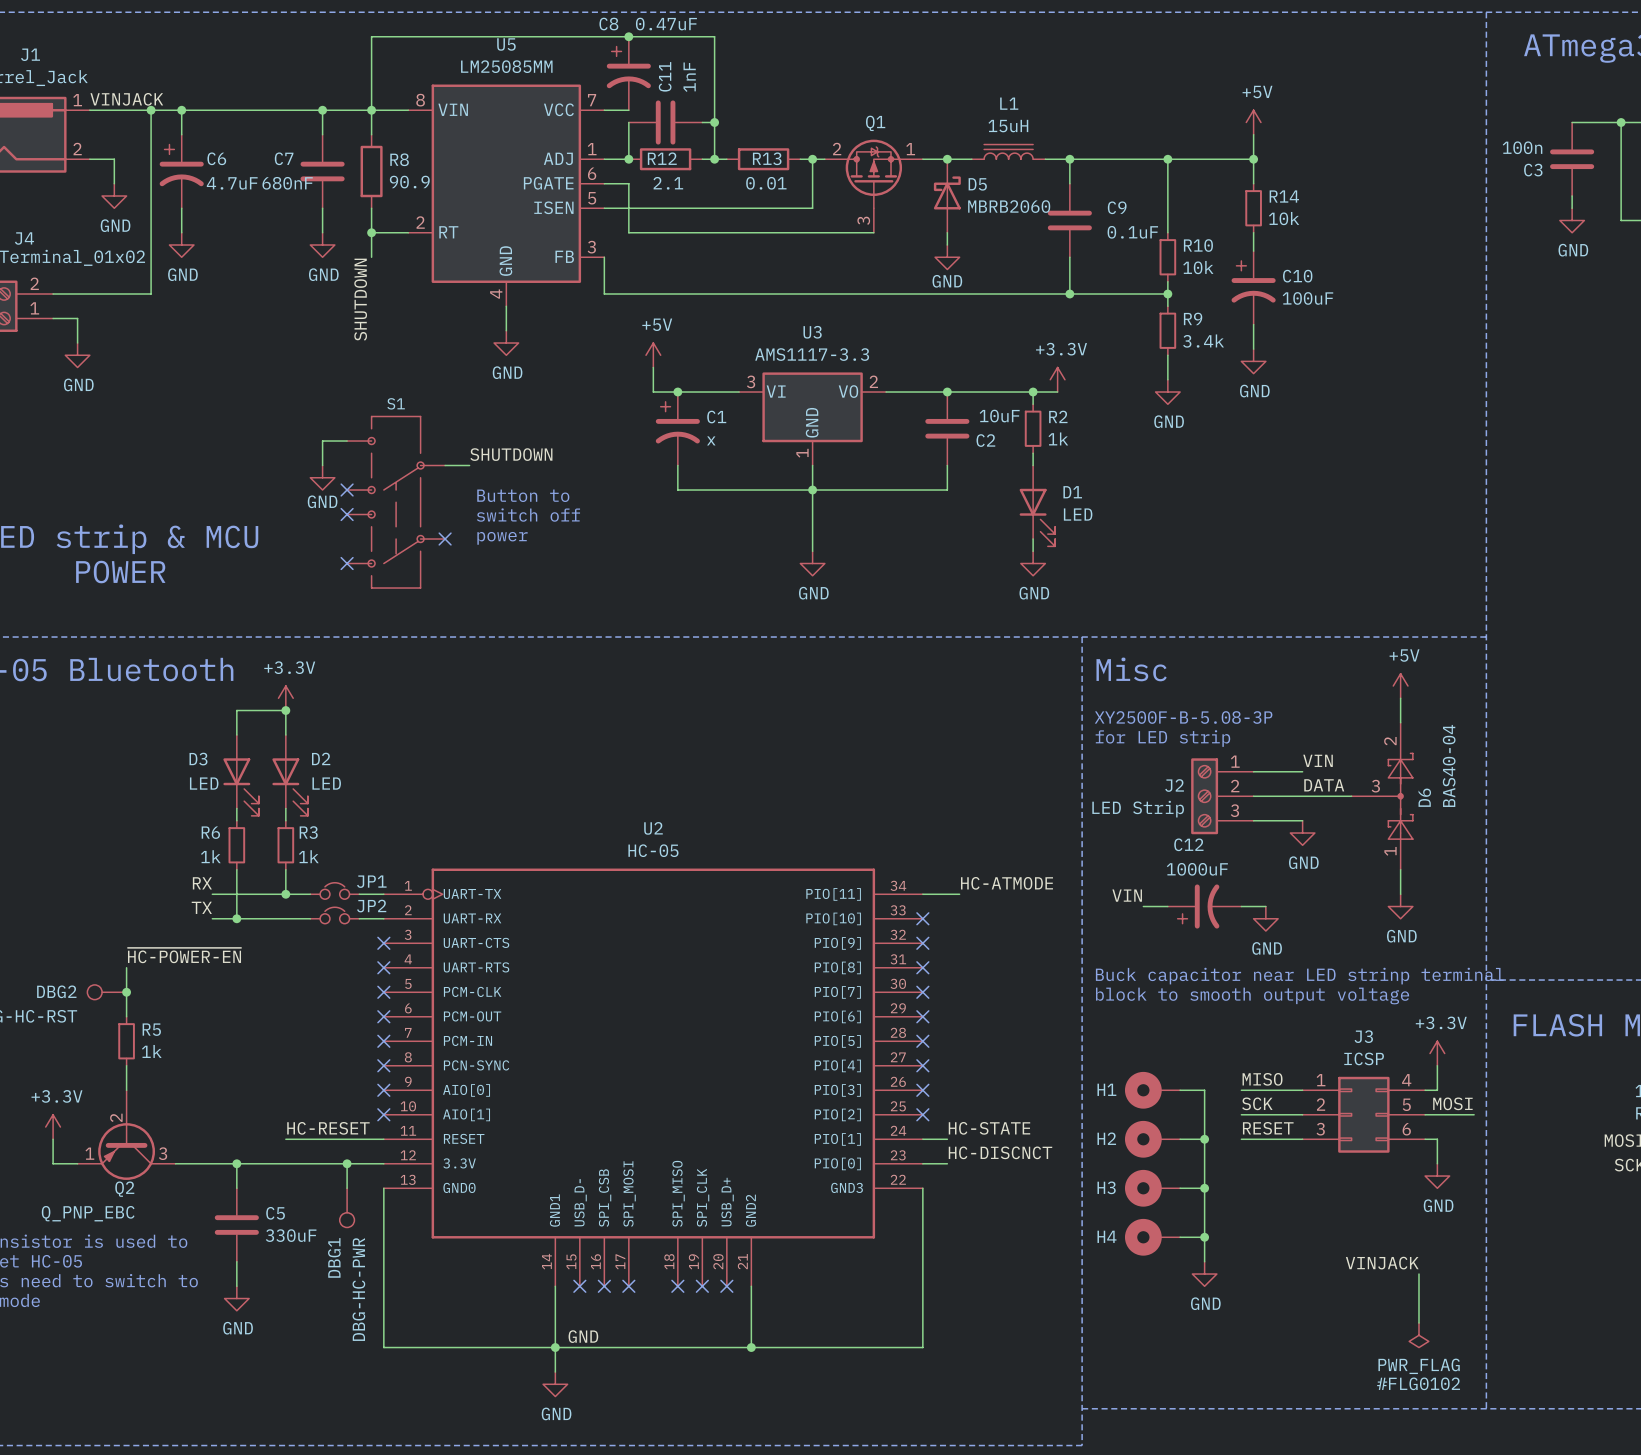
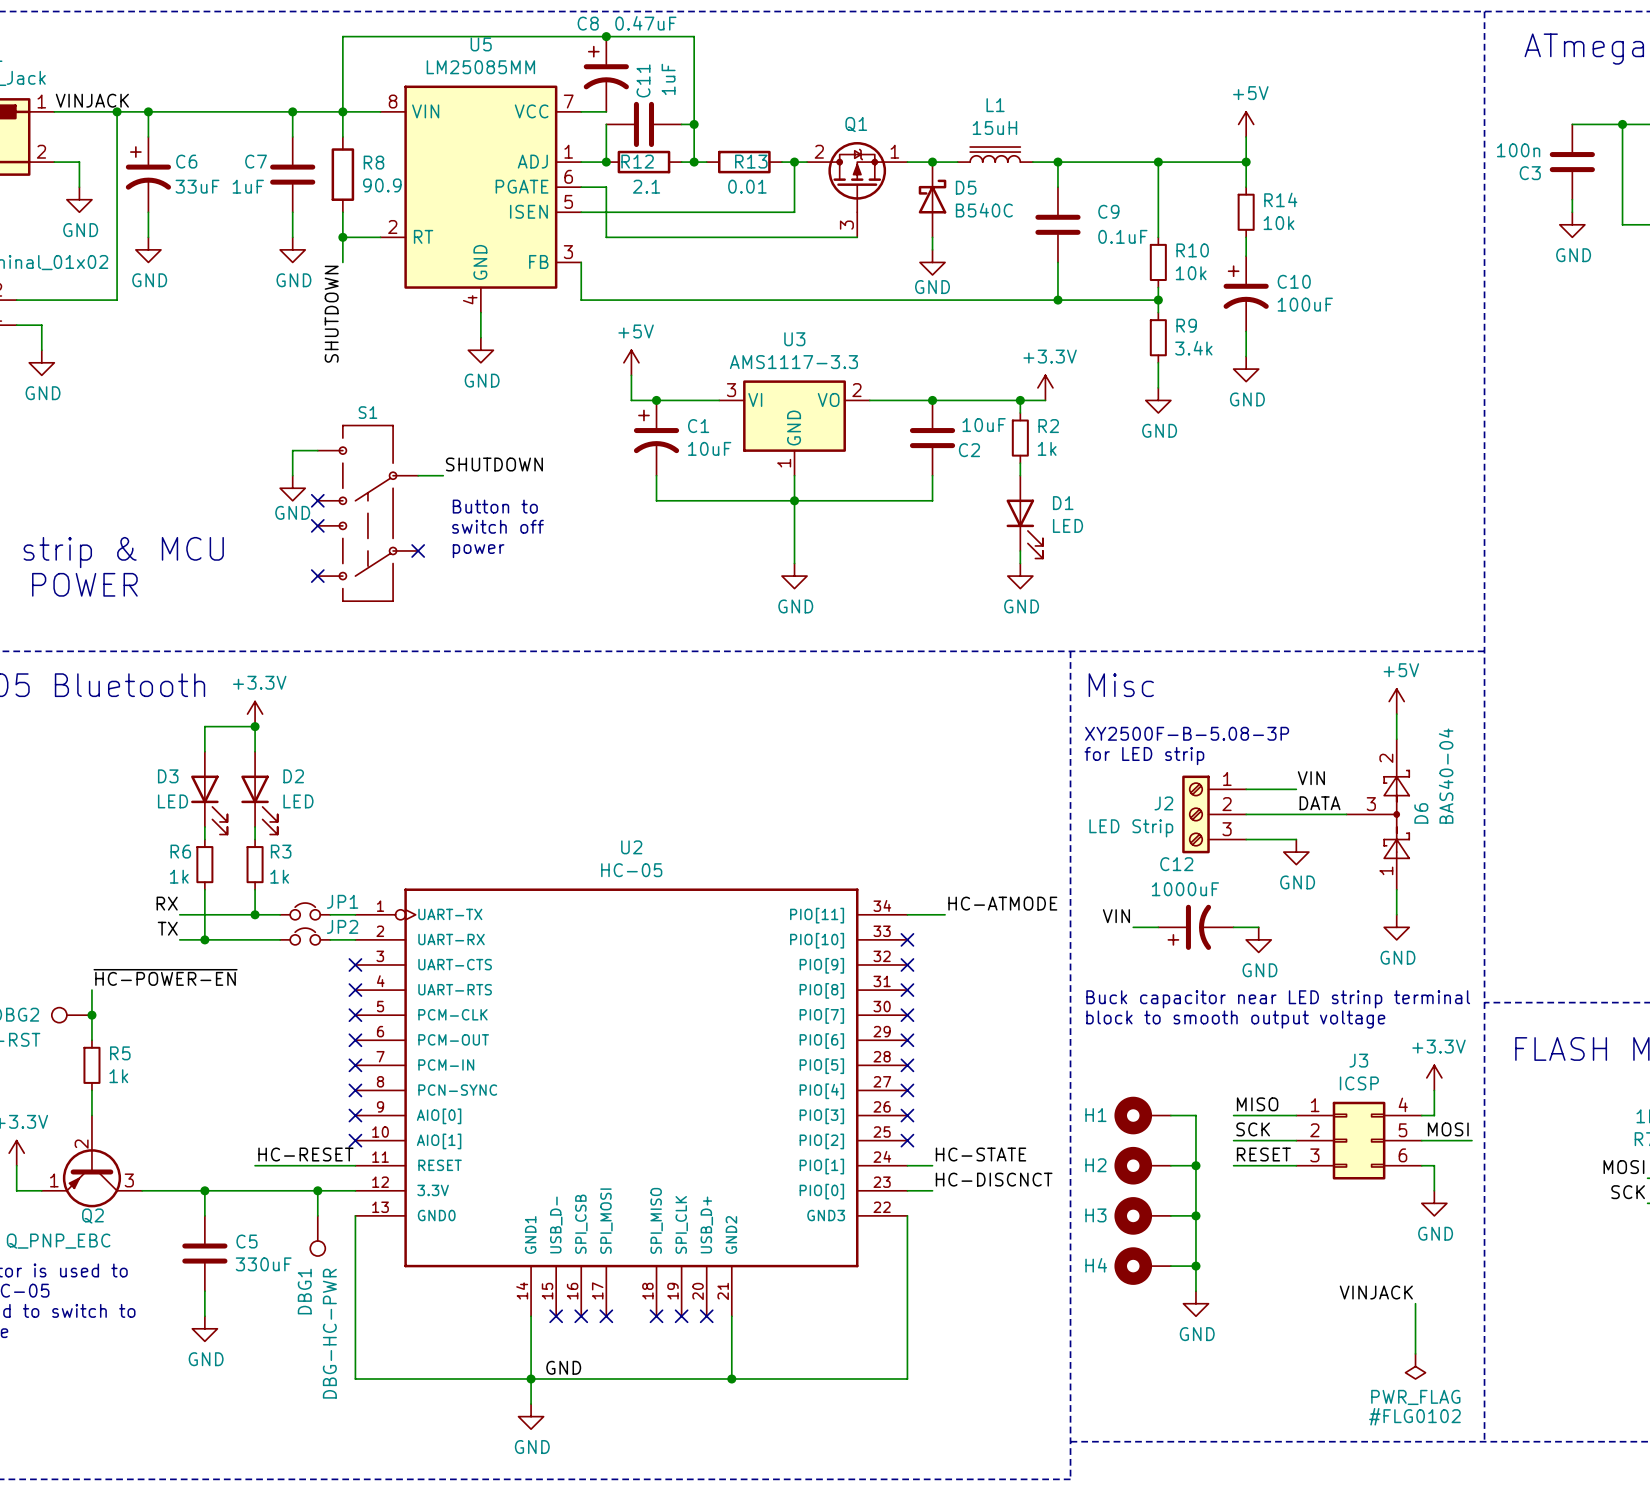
C11 value: 1nF (689, 77) -> 1uF (668, 79)
C6 value: 4.7uF (232, 183) -> 33uF (197, 186)
C7 value: 680nF (287, 183) -> 1uF (248, 186)
D5 value: MBRB2060 (1009, 206) -> B540C (984, 210)
C1 value: x (711, 440) -> 10uF (709, 448)

